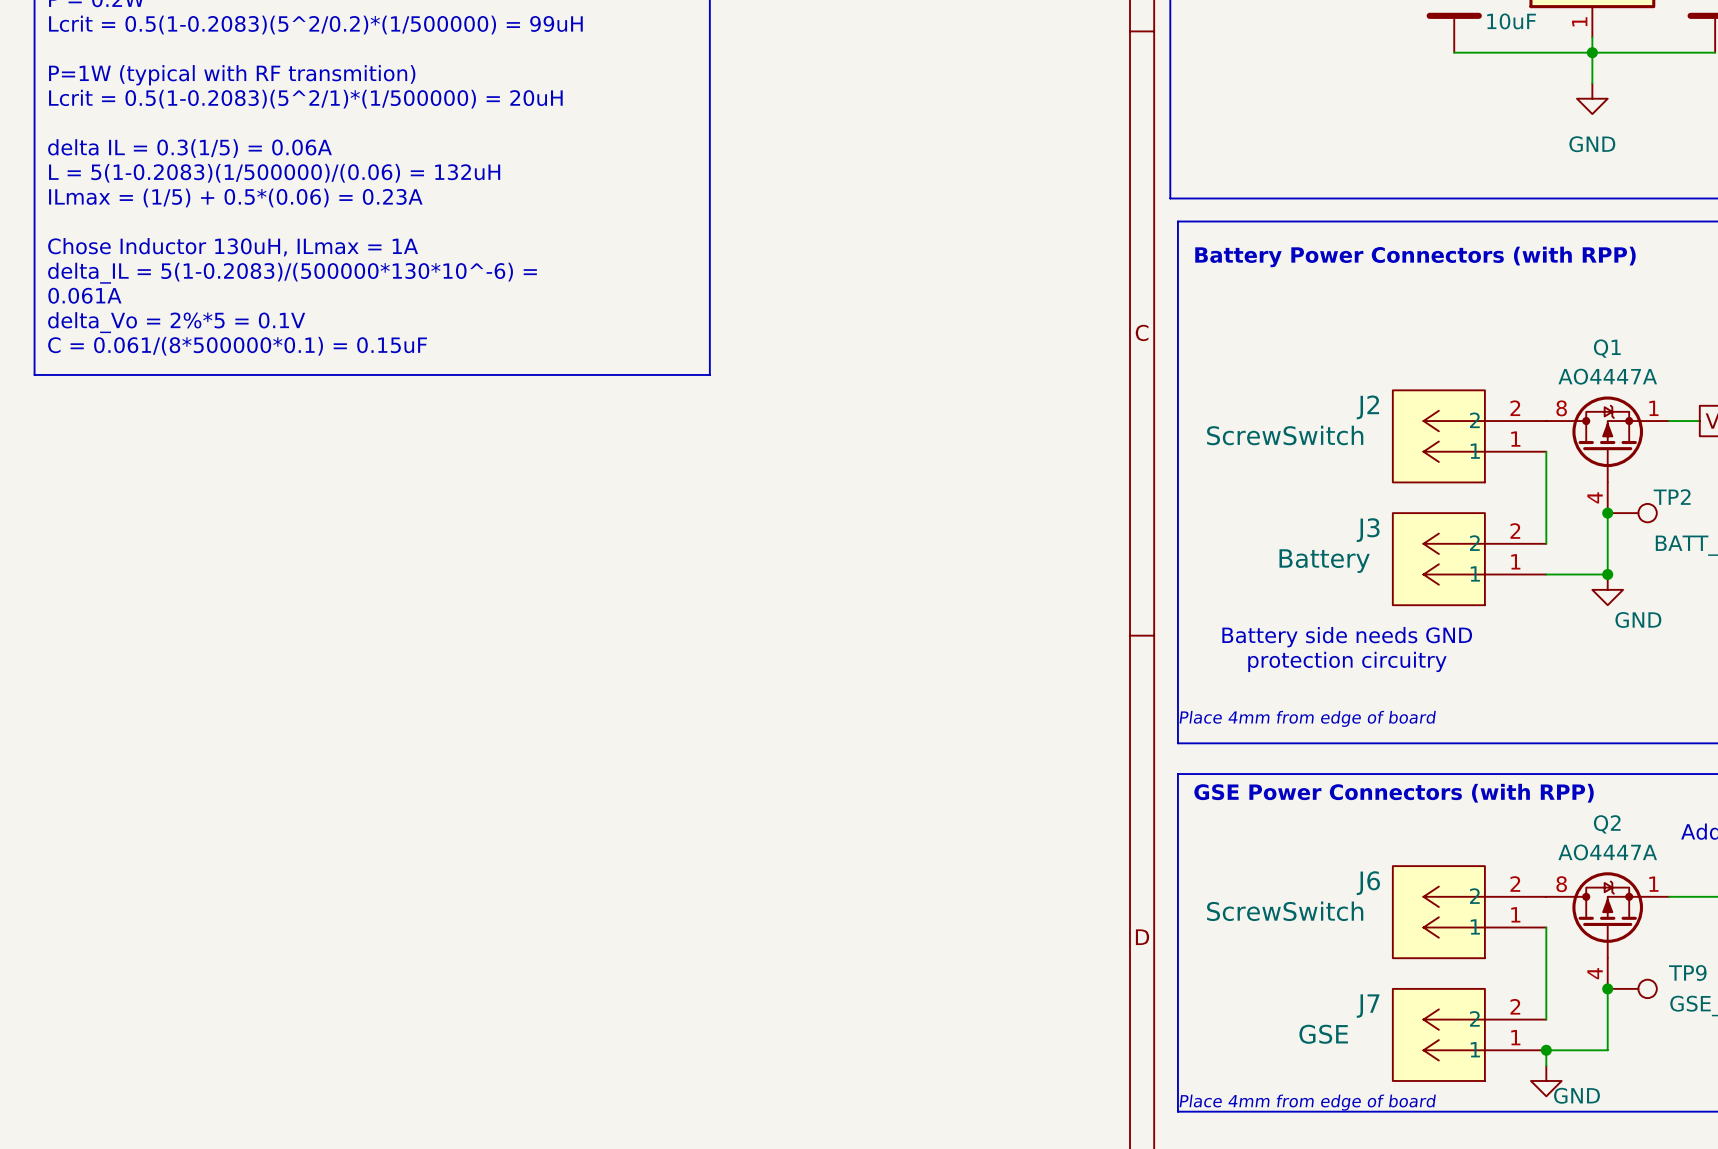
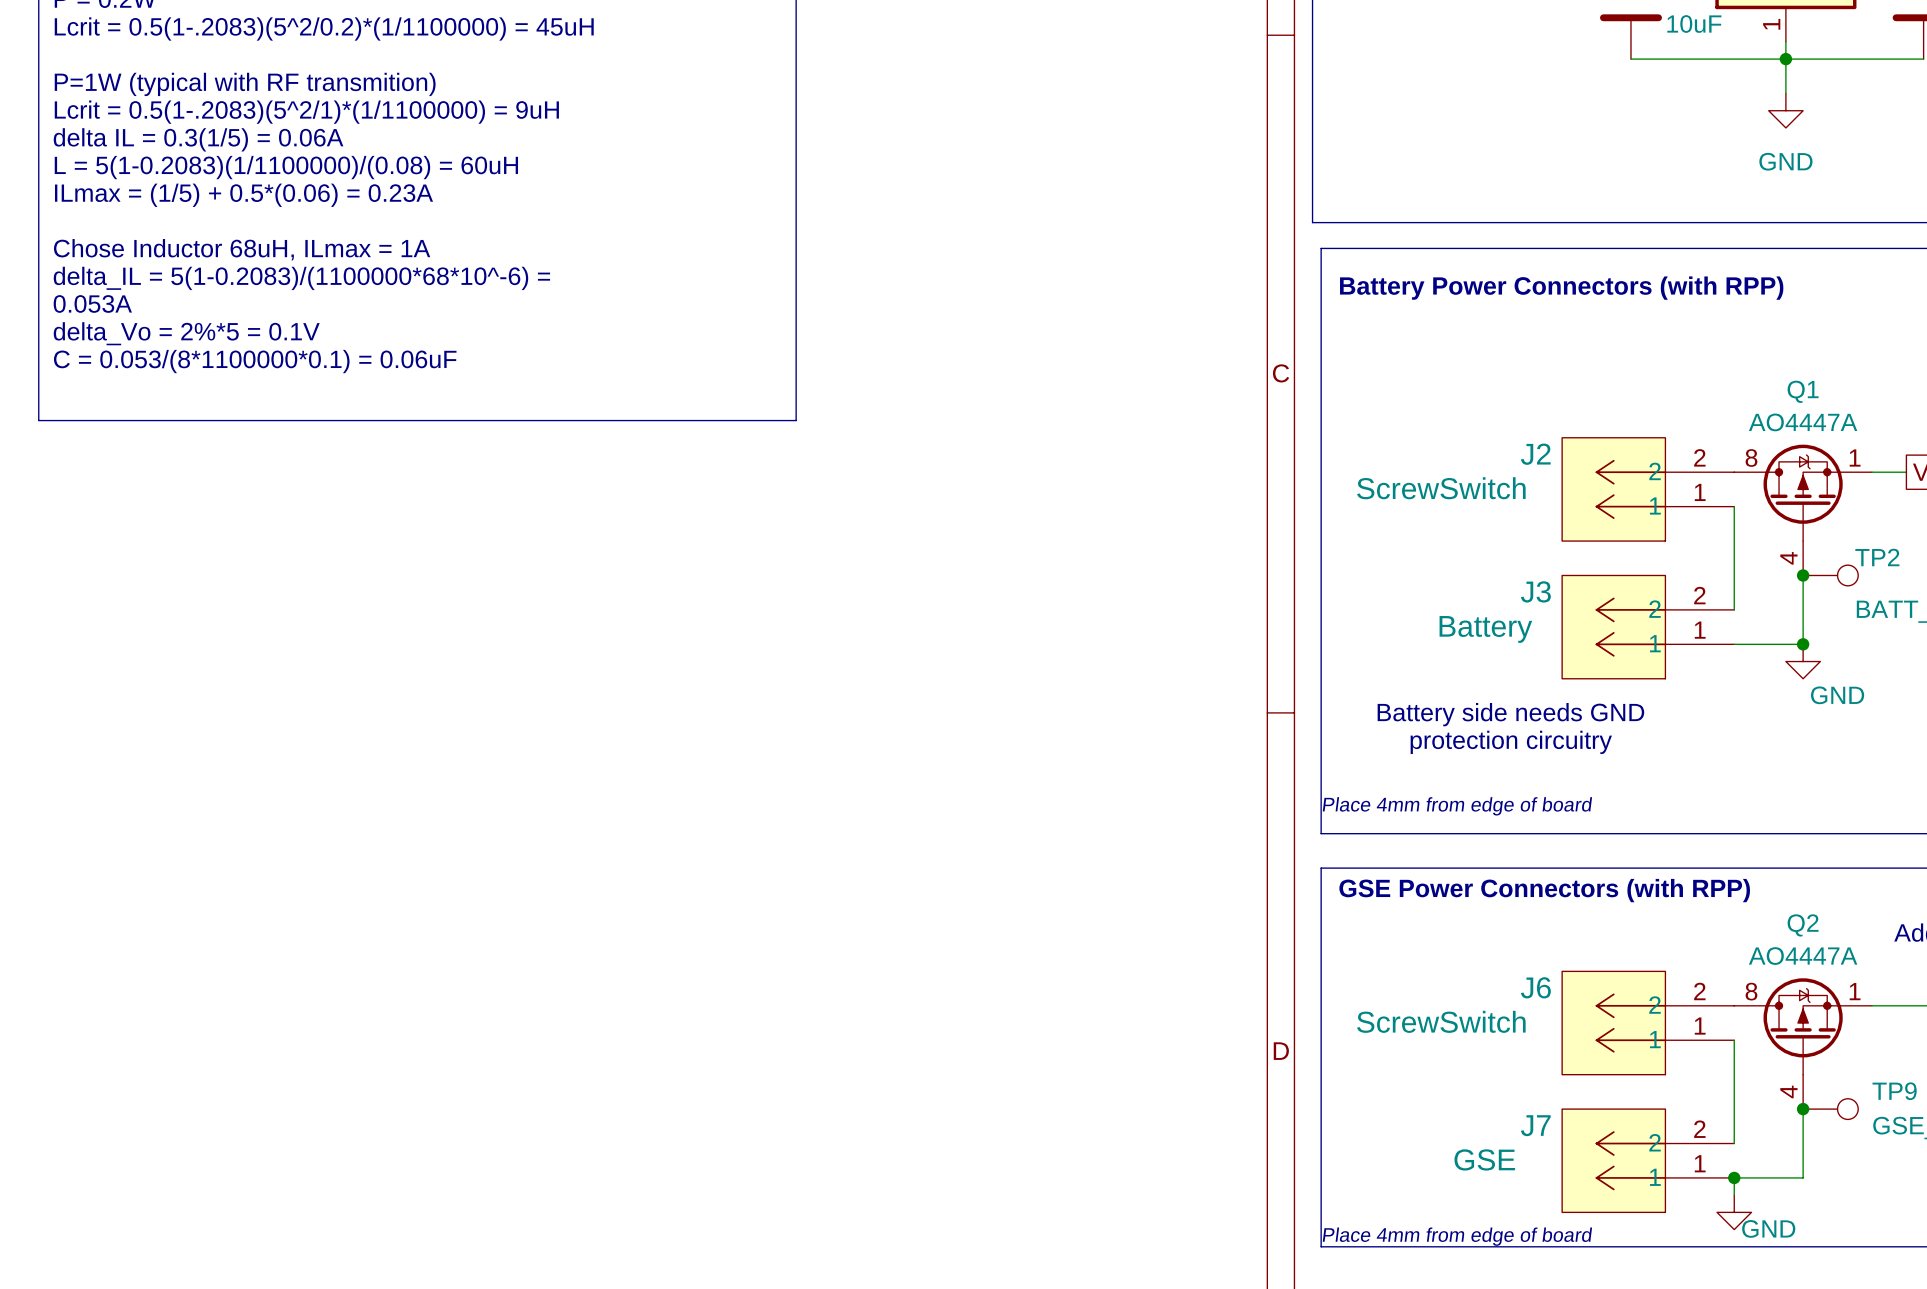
text: Lcrit = 0.5(1-0.2083)(5^2/0.2)*(1/500000) = 99uH (315, 25) -> Lcrit = 0.5(1-.2083)(5^2/0.2)*(1/1100000) = 45uH (324, 28)
text: Lcrit = 0.5(1-0.2083)(5^2/1)*(1/500000) = 20uH (305, 99) -> Lcrit = 0.5(1-.2083)(5^2/1)*(1/1100000) = 9uH (306, 112)
text: none -> delta IL = 0.3(1/5) = 0.06A (198, 139)
text: delta IL = 0.3(1/5) = 0.06A (190, 148) -> L = 5(1-0.2083)(1/1100000)/(0.08) = 60uH (286, 167)
text: L = 5(1-0.2083)(1/500000)/(0.06) = 132uH (274, 173) -> ILmax = (1/5) + 0.5*(0.06) = 0.23A (244, 195)
text: ILmax = (1/5) + 0.5*(0.06) = 0.23A (235, 197) -> none
text: none -> Chose Inductor 68uH, ILmax = 1A (242, 249)
text: Chose Inductor 130uH, ILmax = 1A (233, 247) -> delta_IL = 5(1-0.2083)/(1100000*68*10^-6) = (301, 278)
text: delta_IL = 5(1-0.2083)/(500000*130*10^-6) = (292, 273) -> 0.053A (92, 303)
text: 0.061A (84, 295) -> delta_Vo = 2%*5 = 0.1V (186, 333)
text: delta_Vo = 2%*5 = 0.1V (176, 322) -> C = 0.053/(8*1100000*0.1) = 0.06uF (255, 361)
text: C = 0.061/(8*500000*0.1) = 0.15uF (237, 346) -> none

